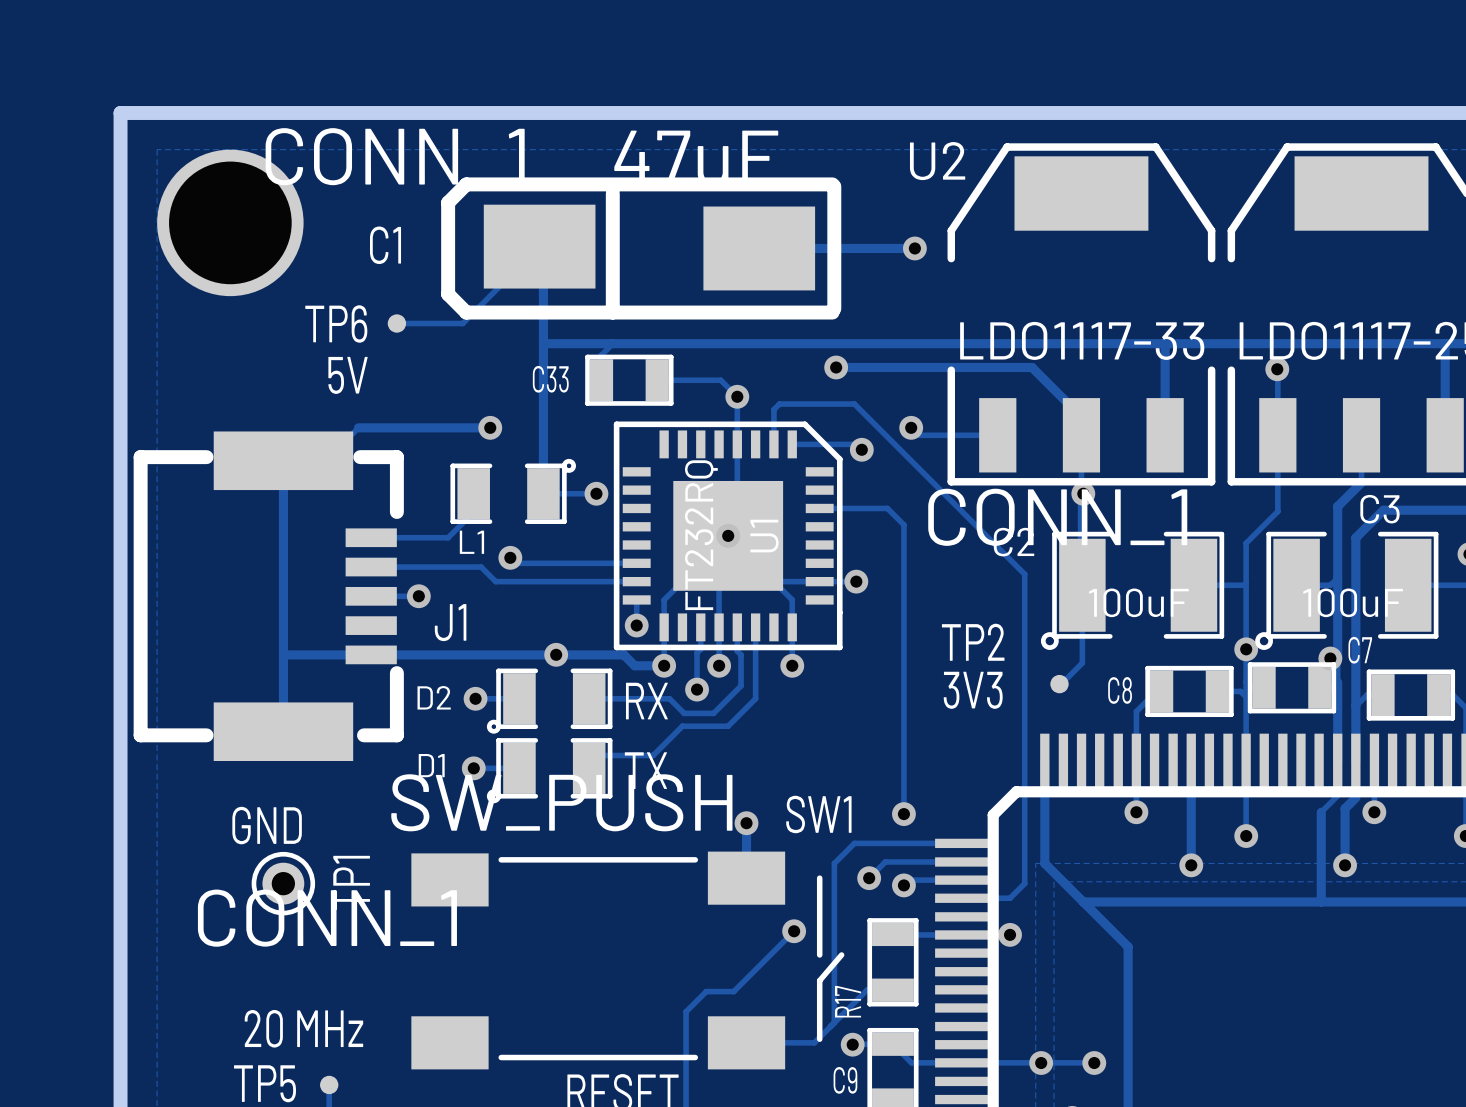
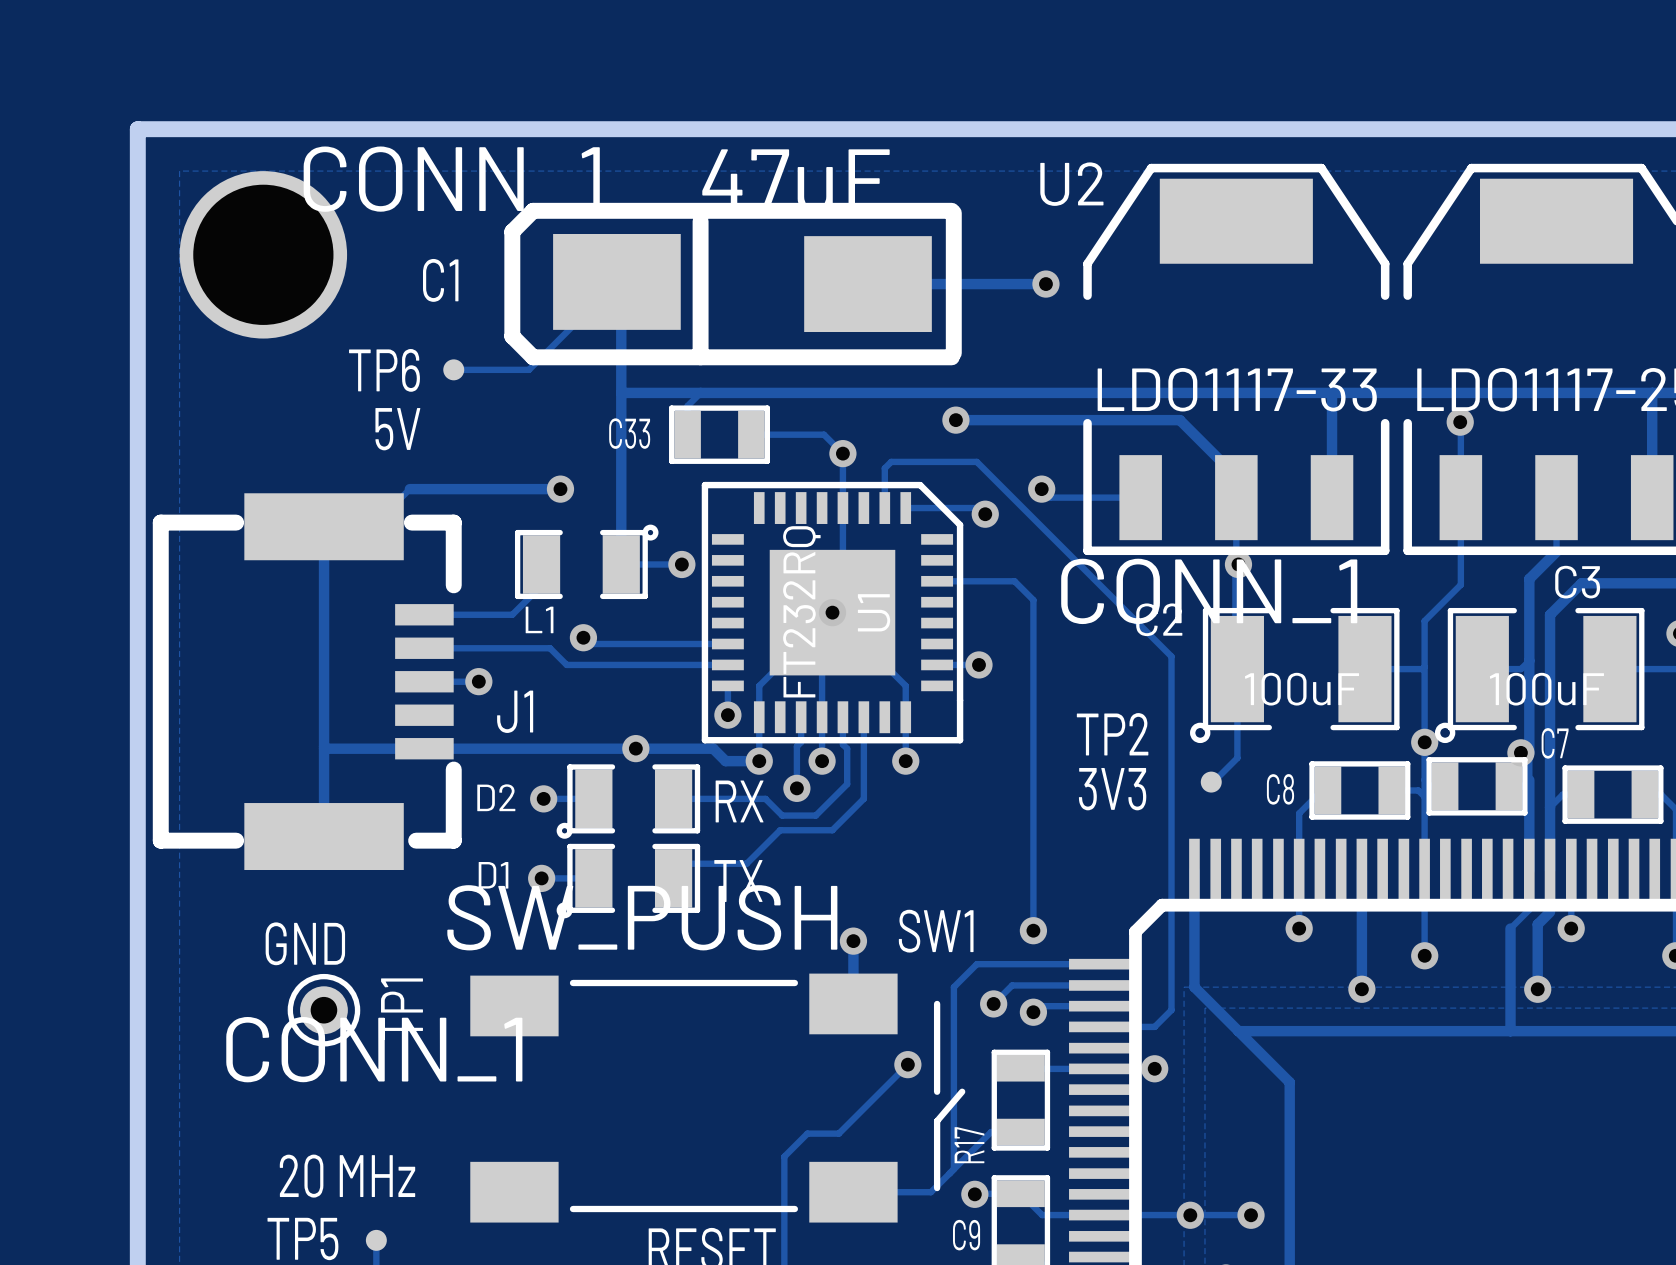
track: (773, 581) (819, 581) -> none

